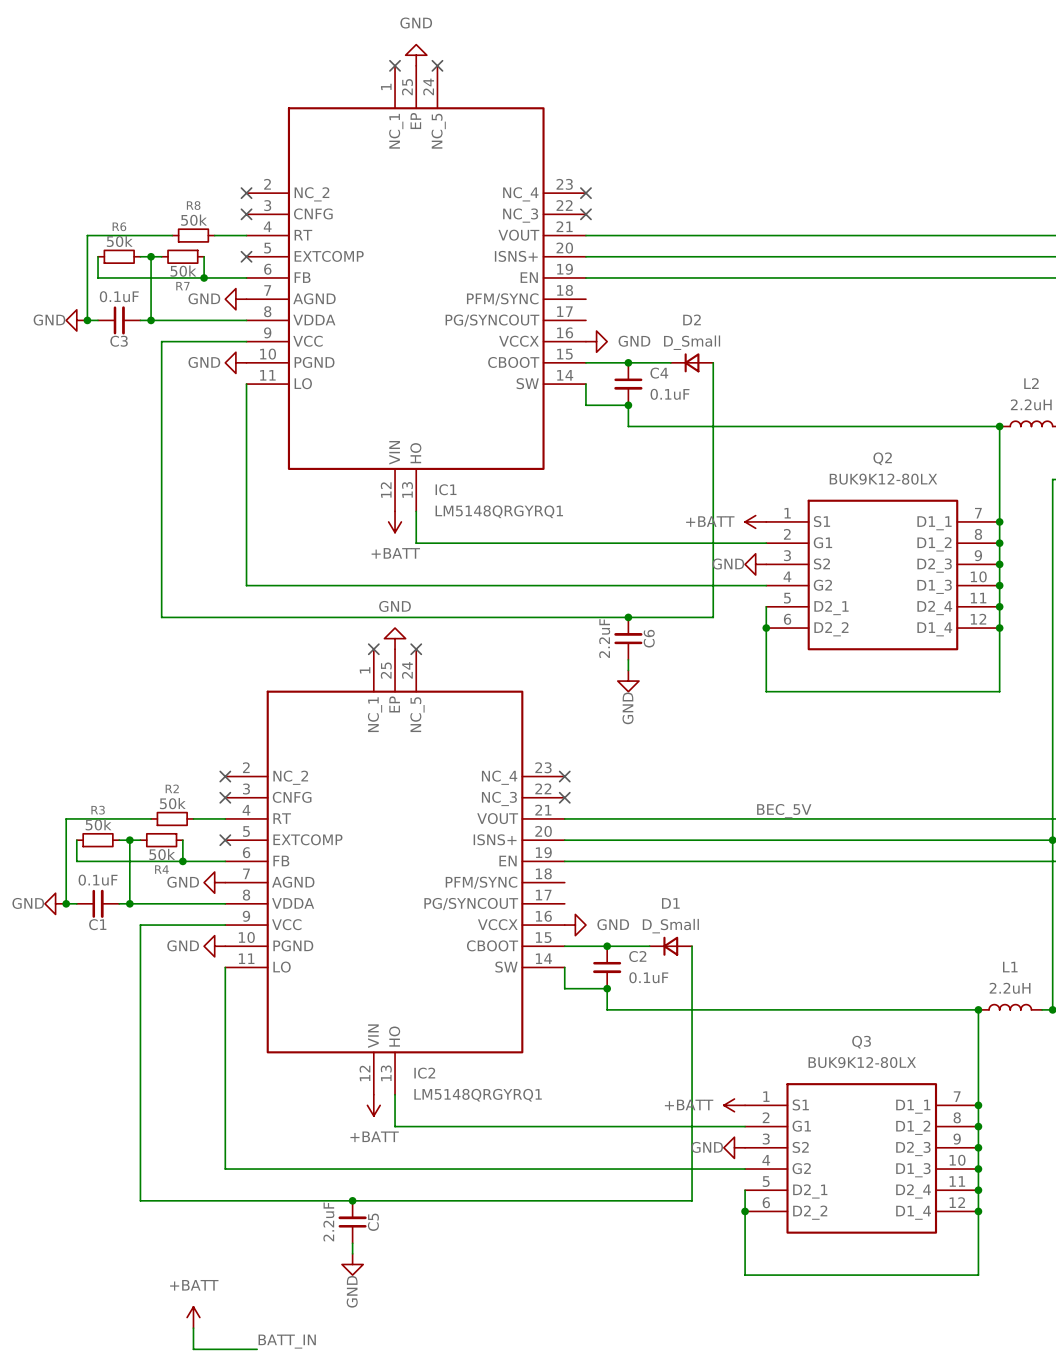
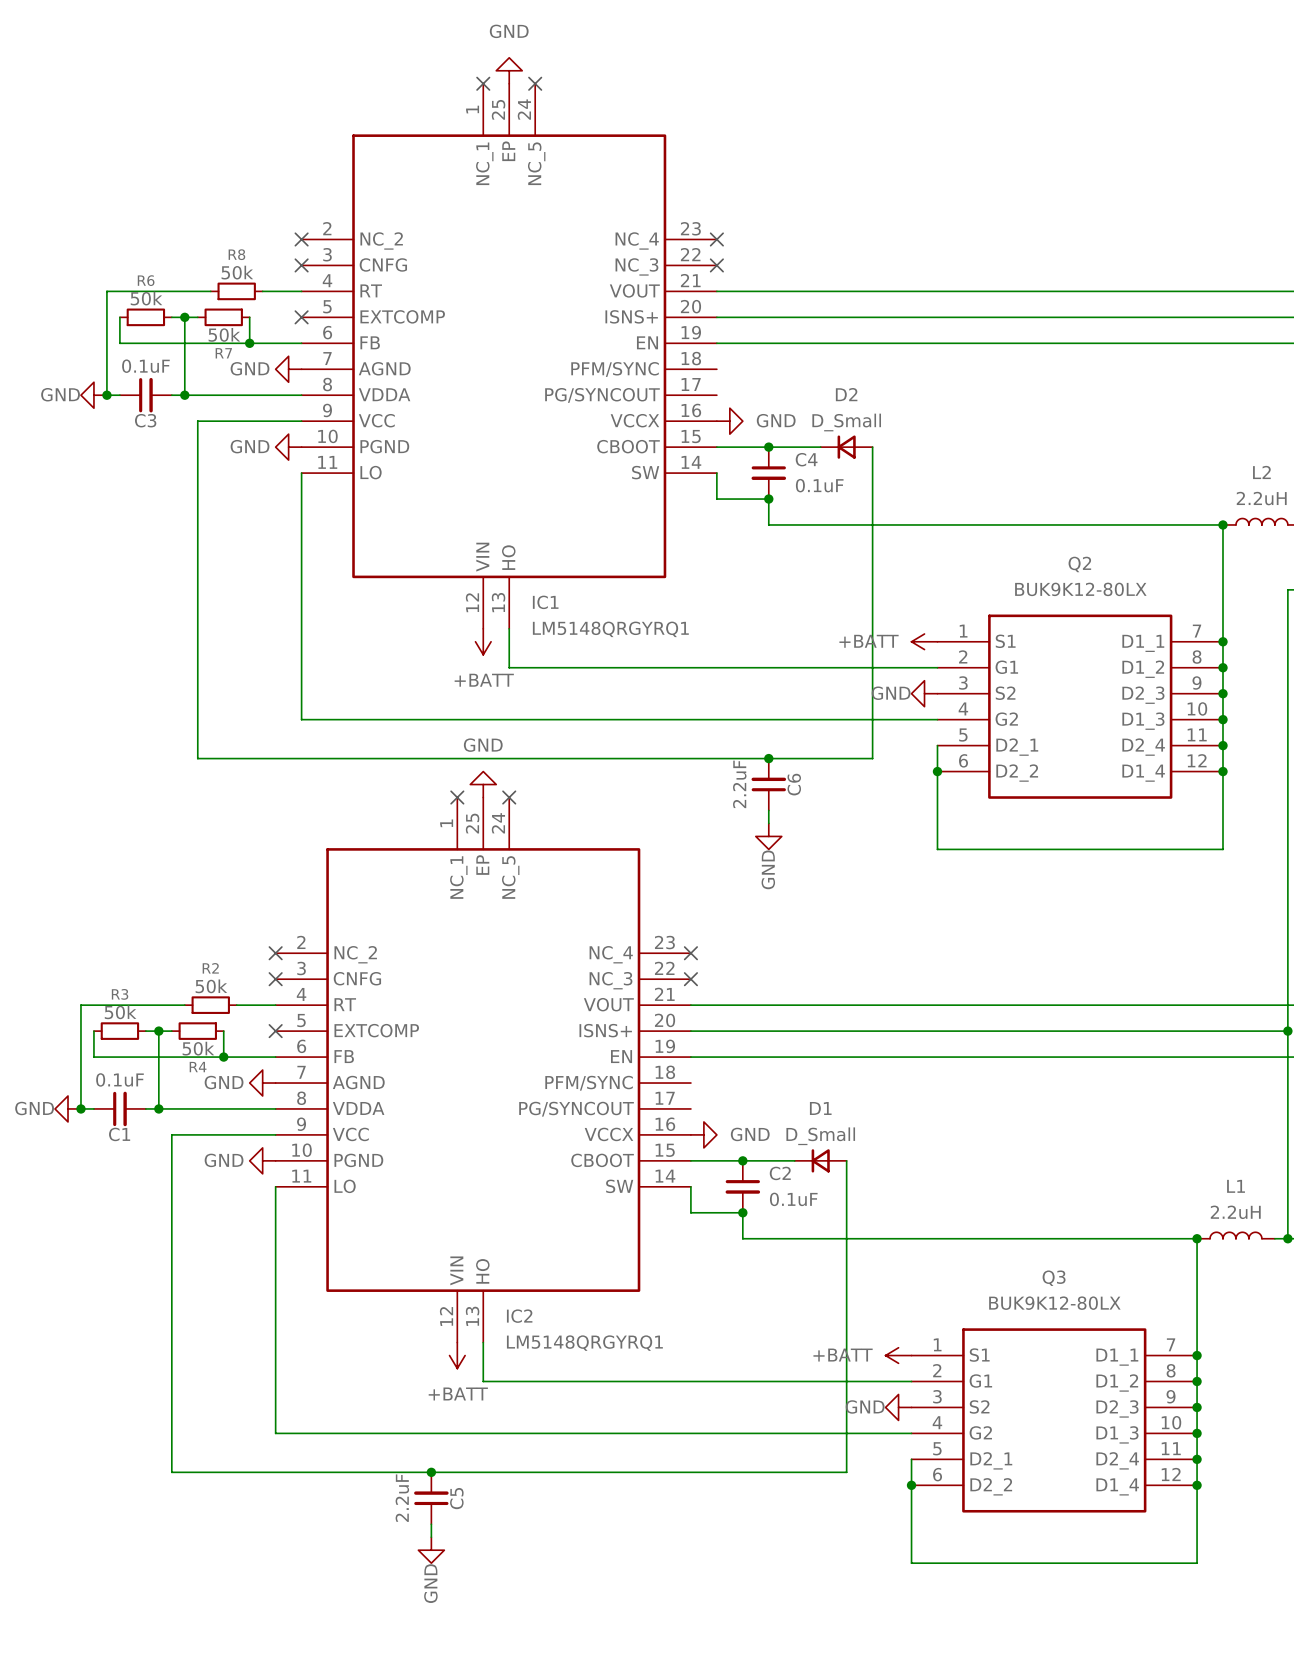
label: BEC_5V (784, 811) -> none
power symbol: +BATT (193, 1317) -> none
wire: (193, 1328) (193, 1349) (257, 1349) -> none
label: BATT_IN (287, 1341) -> none

